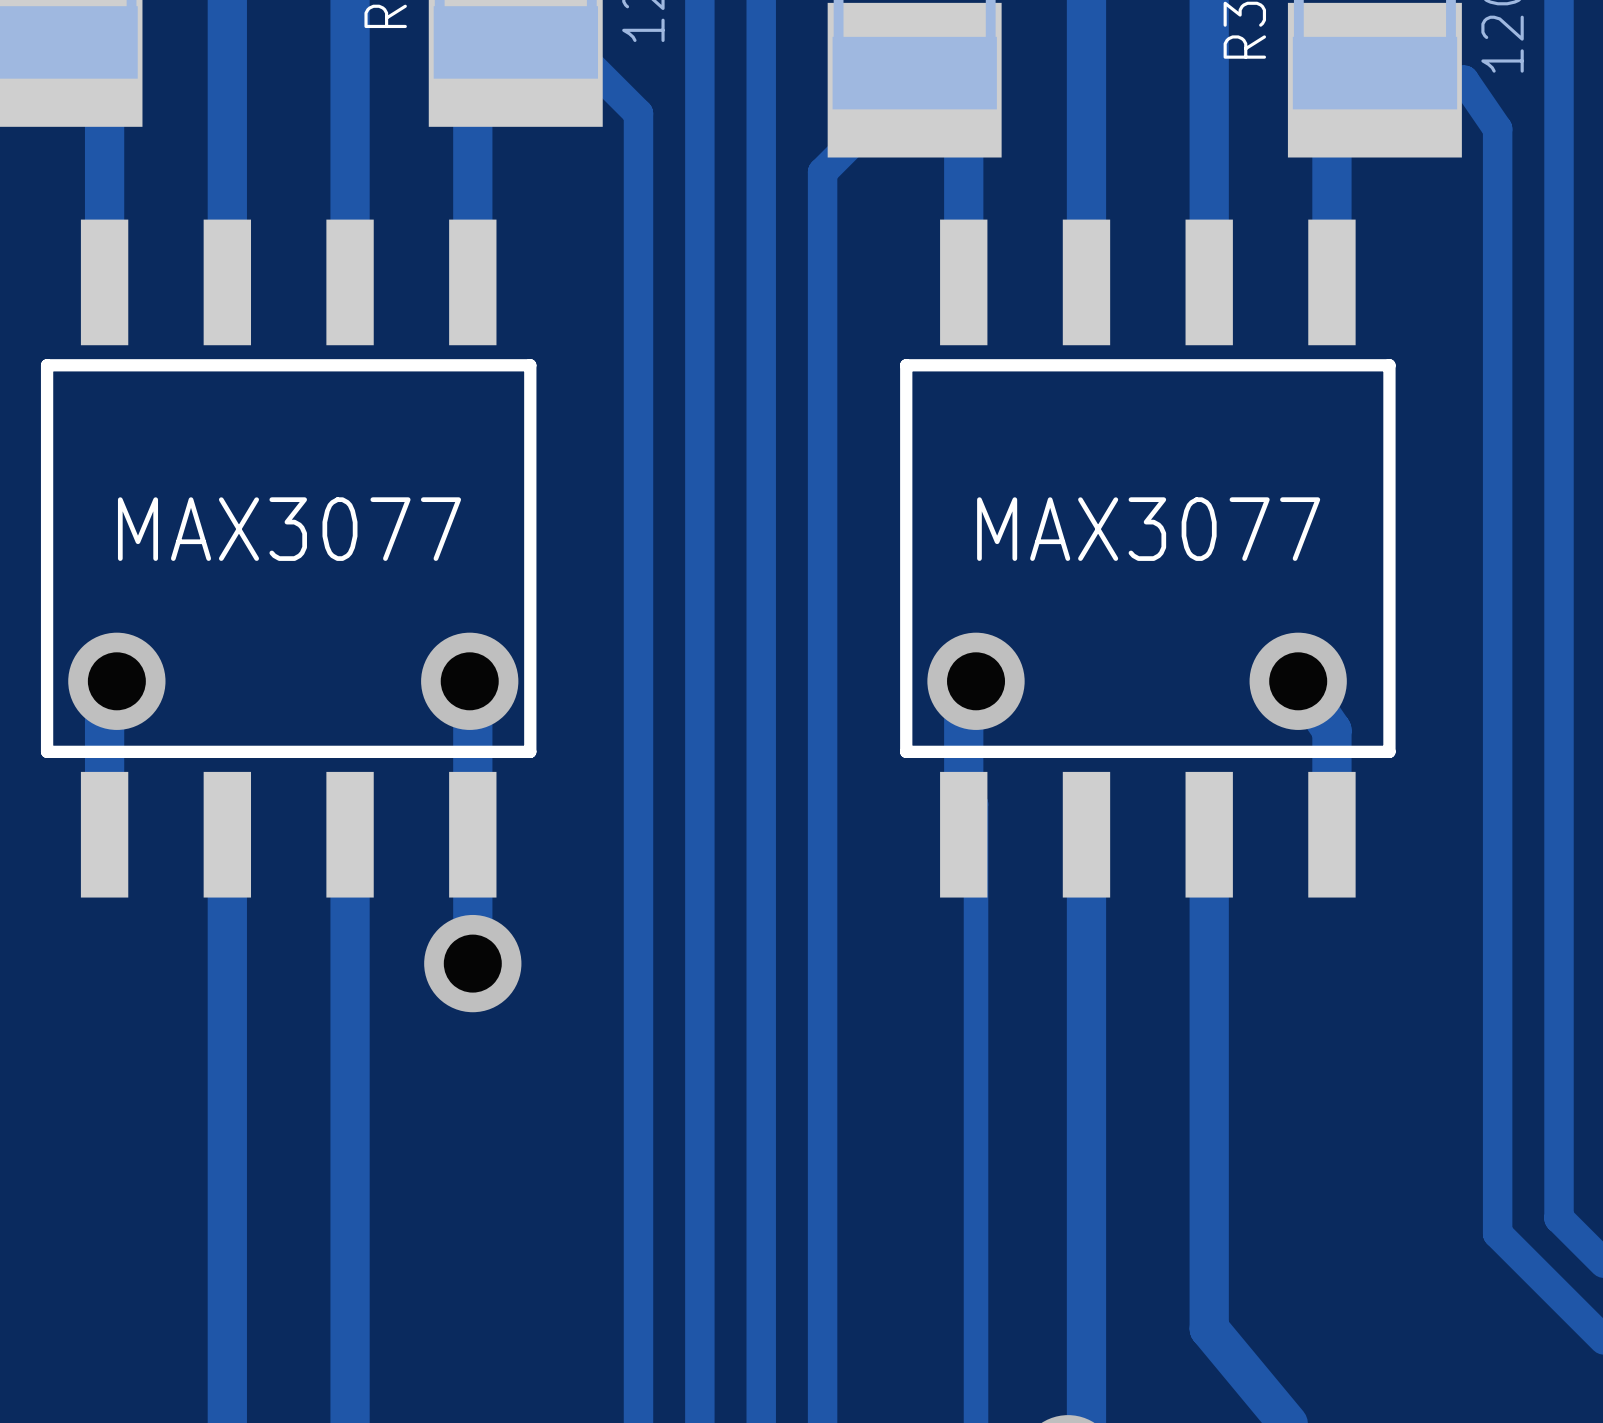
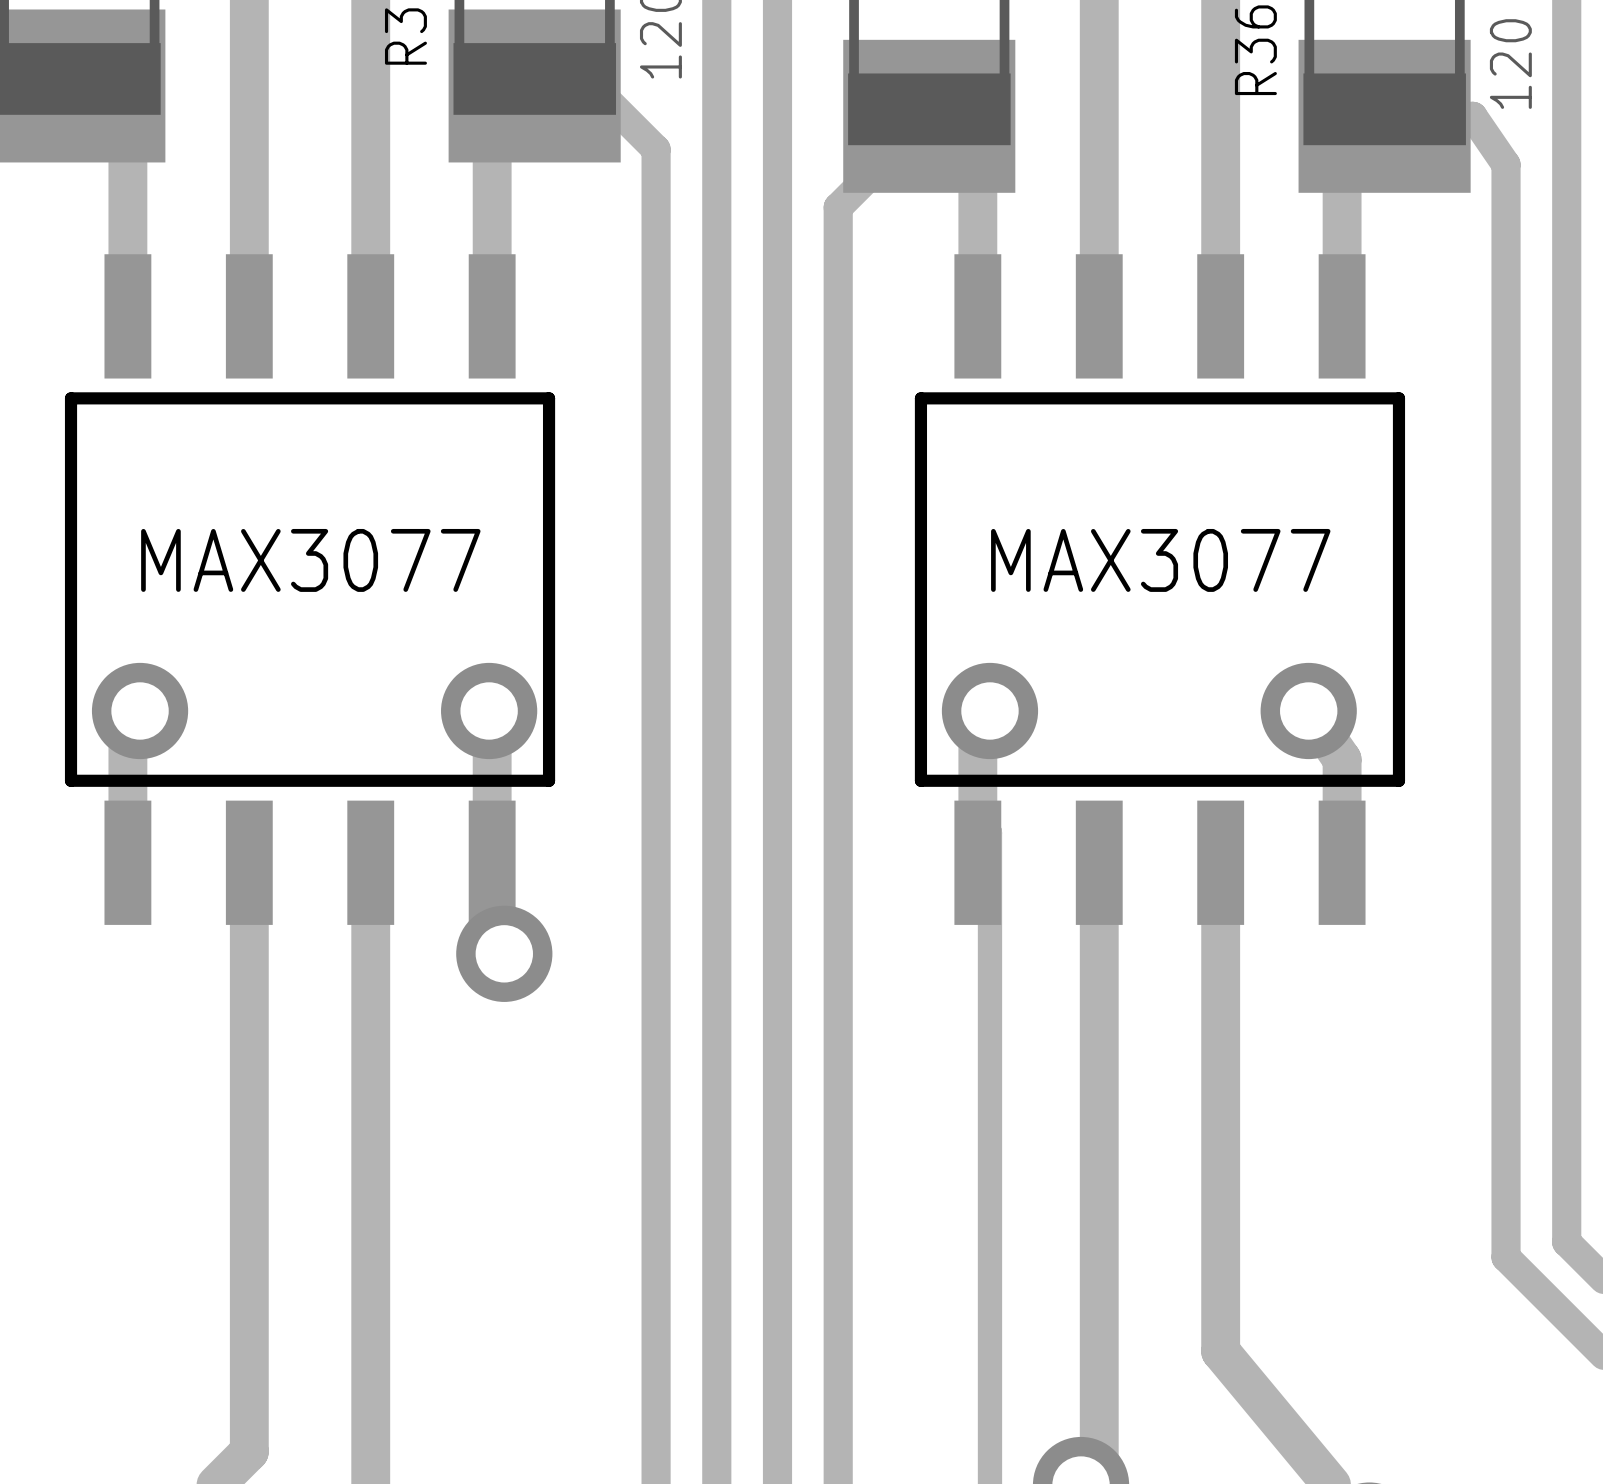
via position: (472, 963) -> (504, 953)

